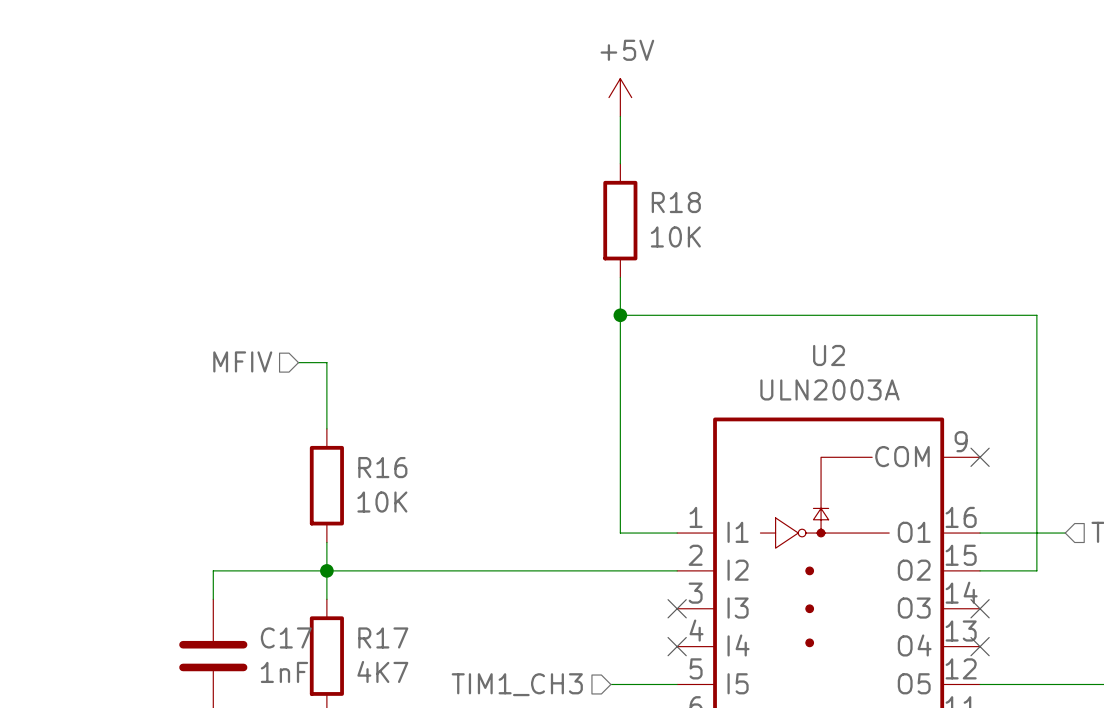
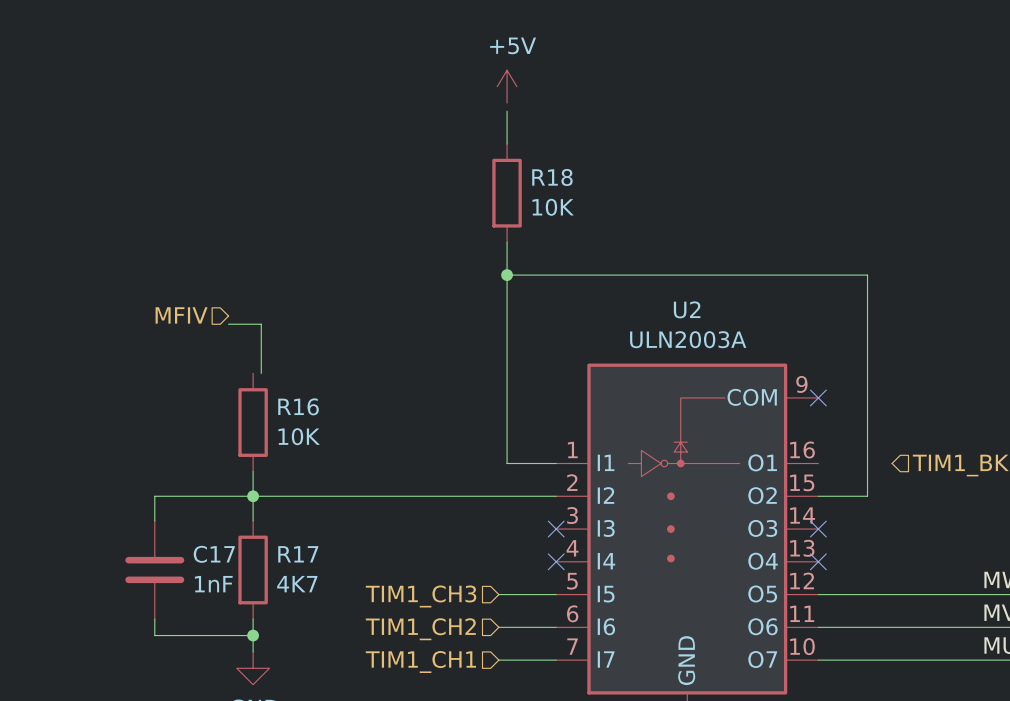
wire: (620, 116) (620, 125) -> none
wire: (298, 362) (326, 362) (326, 428) -> none
wire: none -> (228, 324) (261, 324) (261, 373)
wire: (980, 533) (1065, 533) -> none

